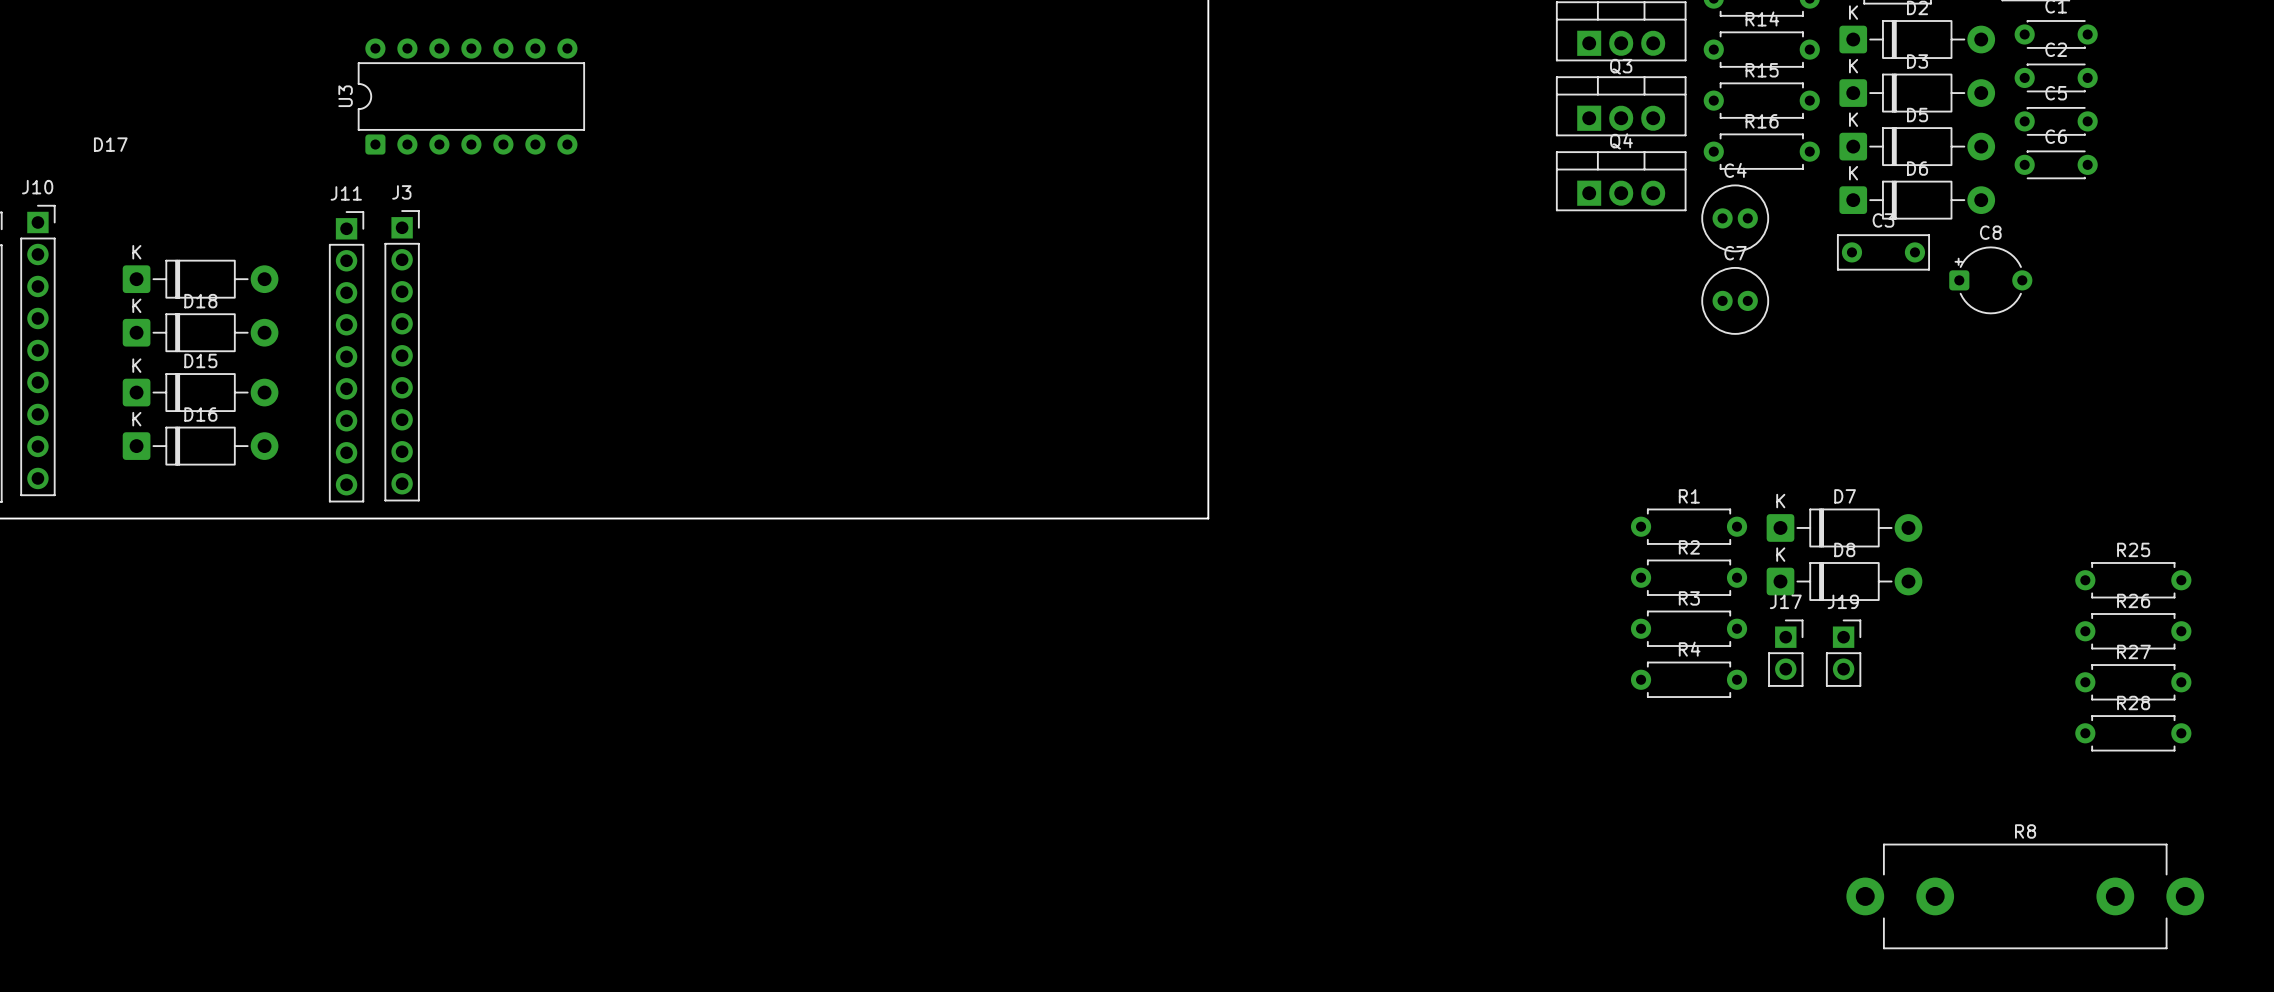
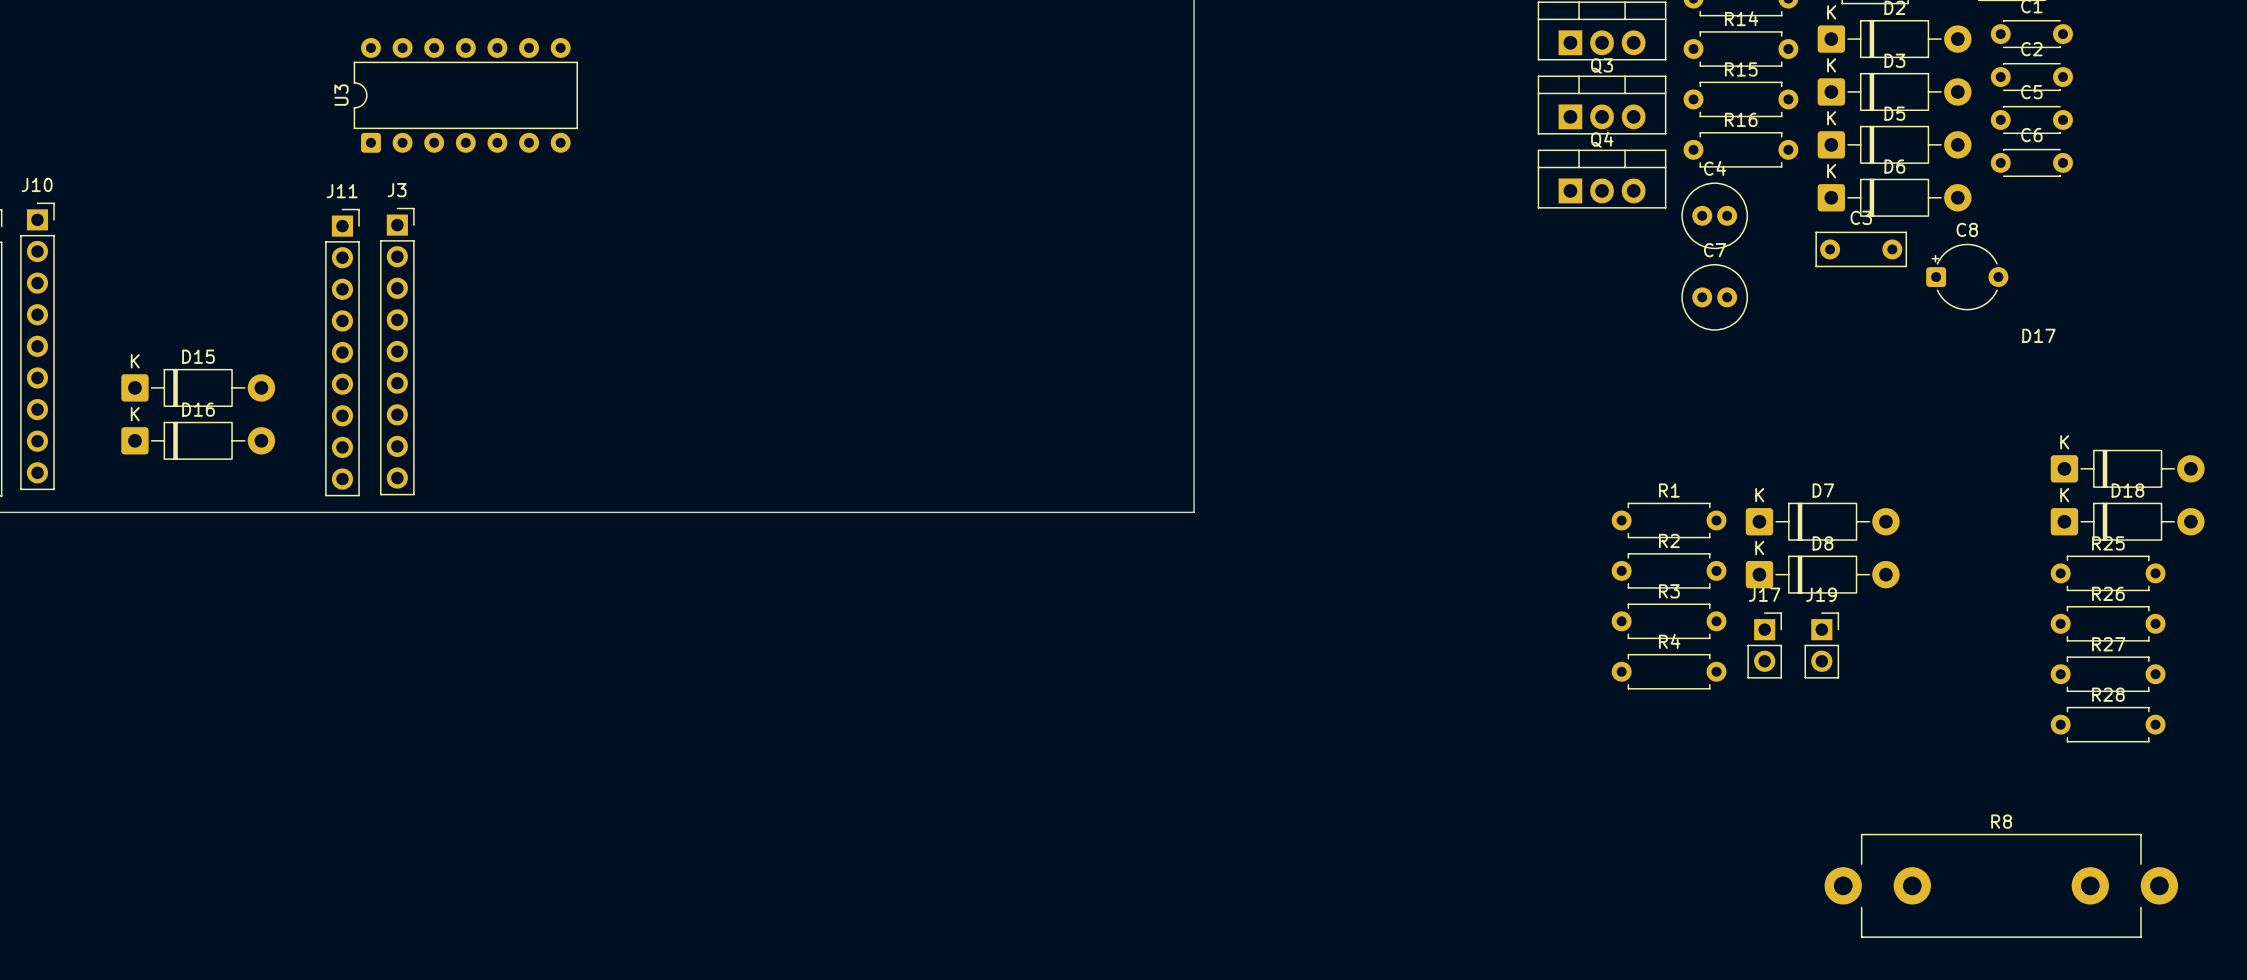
D17 position: (200, 279) -> (2127, 468)
D18 position: (200, 332) -> (2127, 521)

